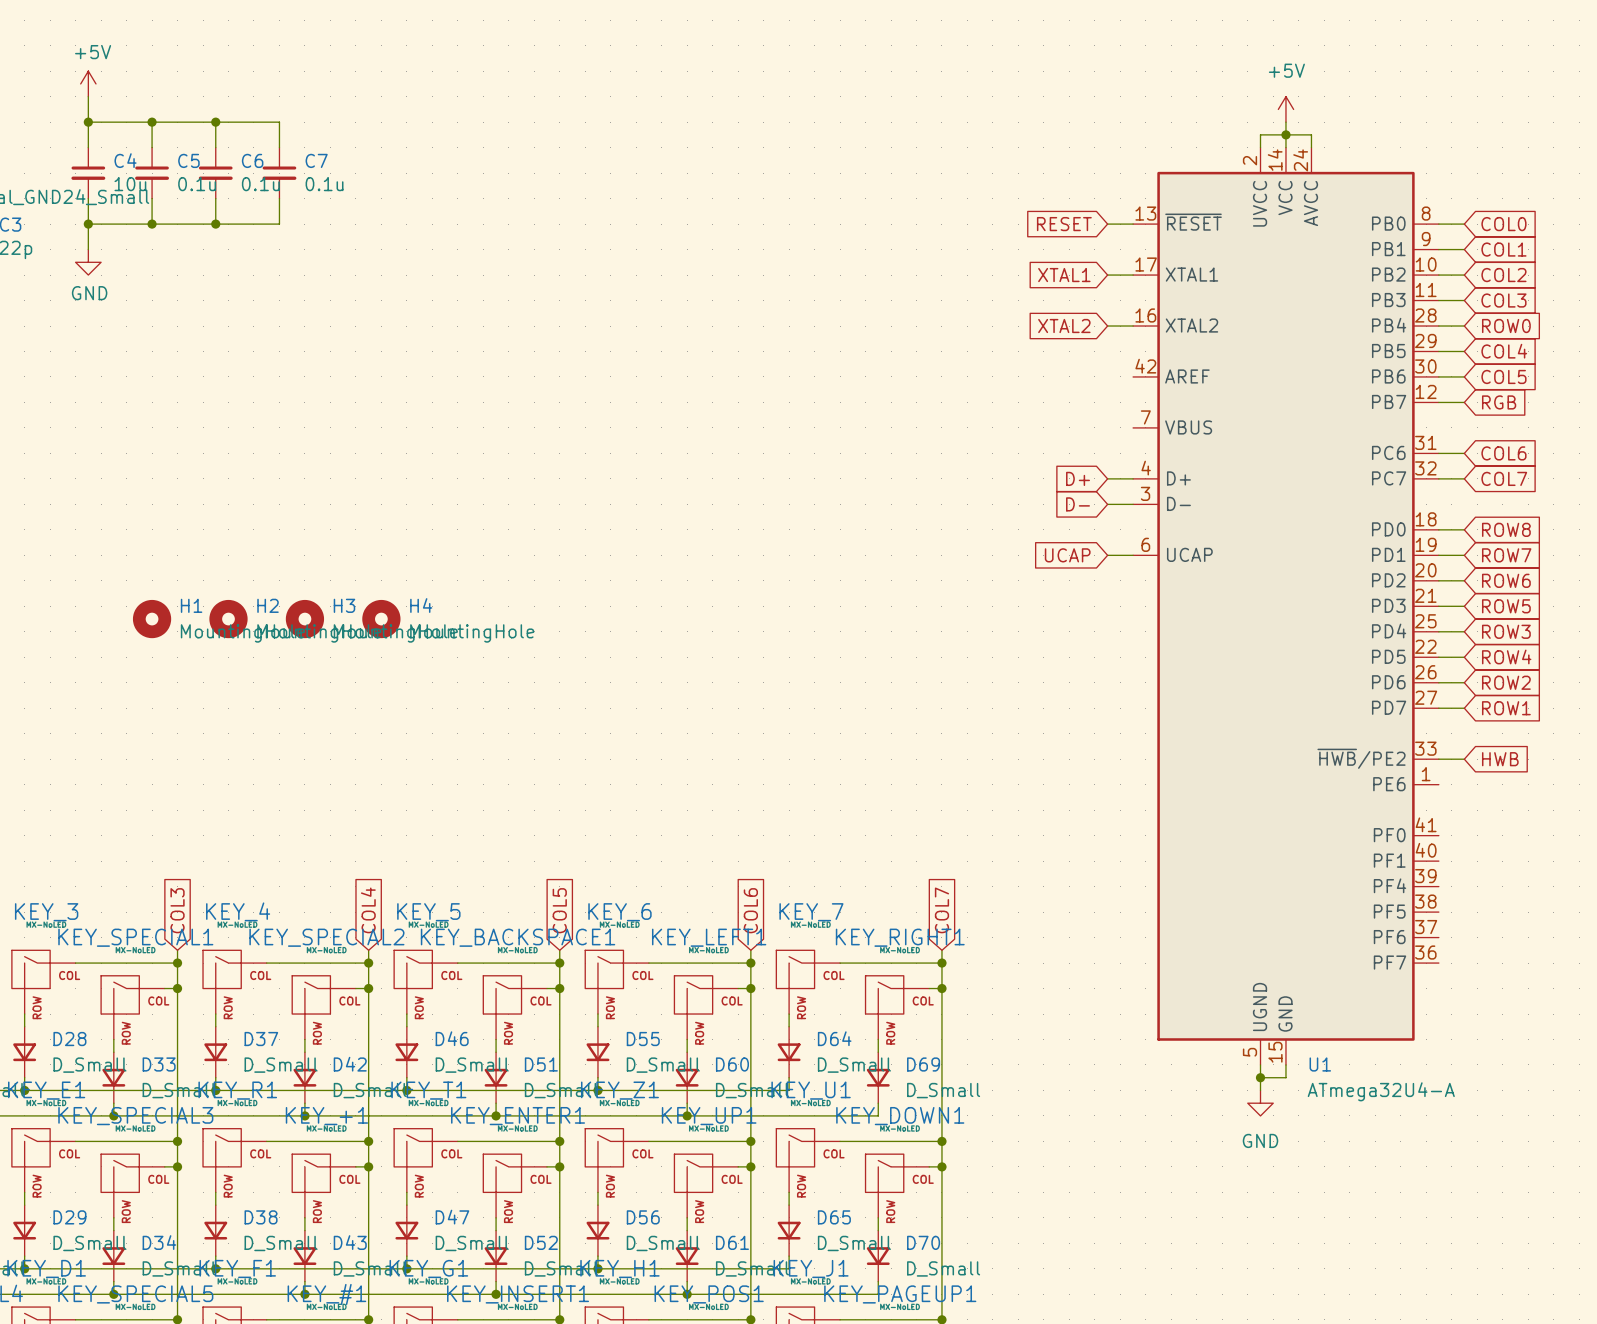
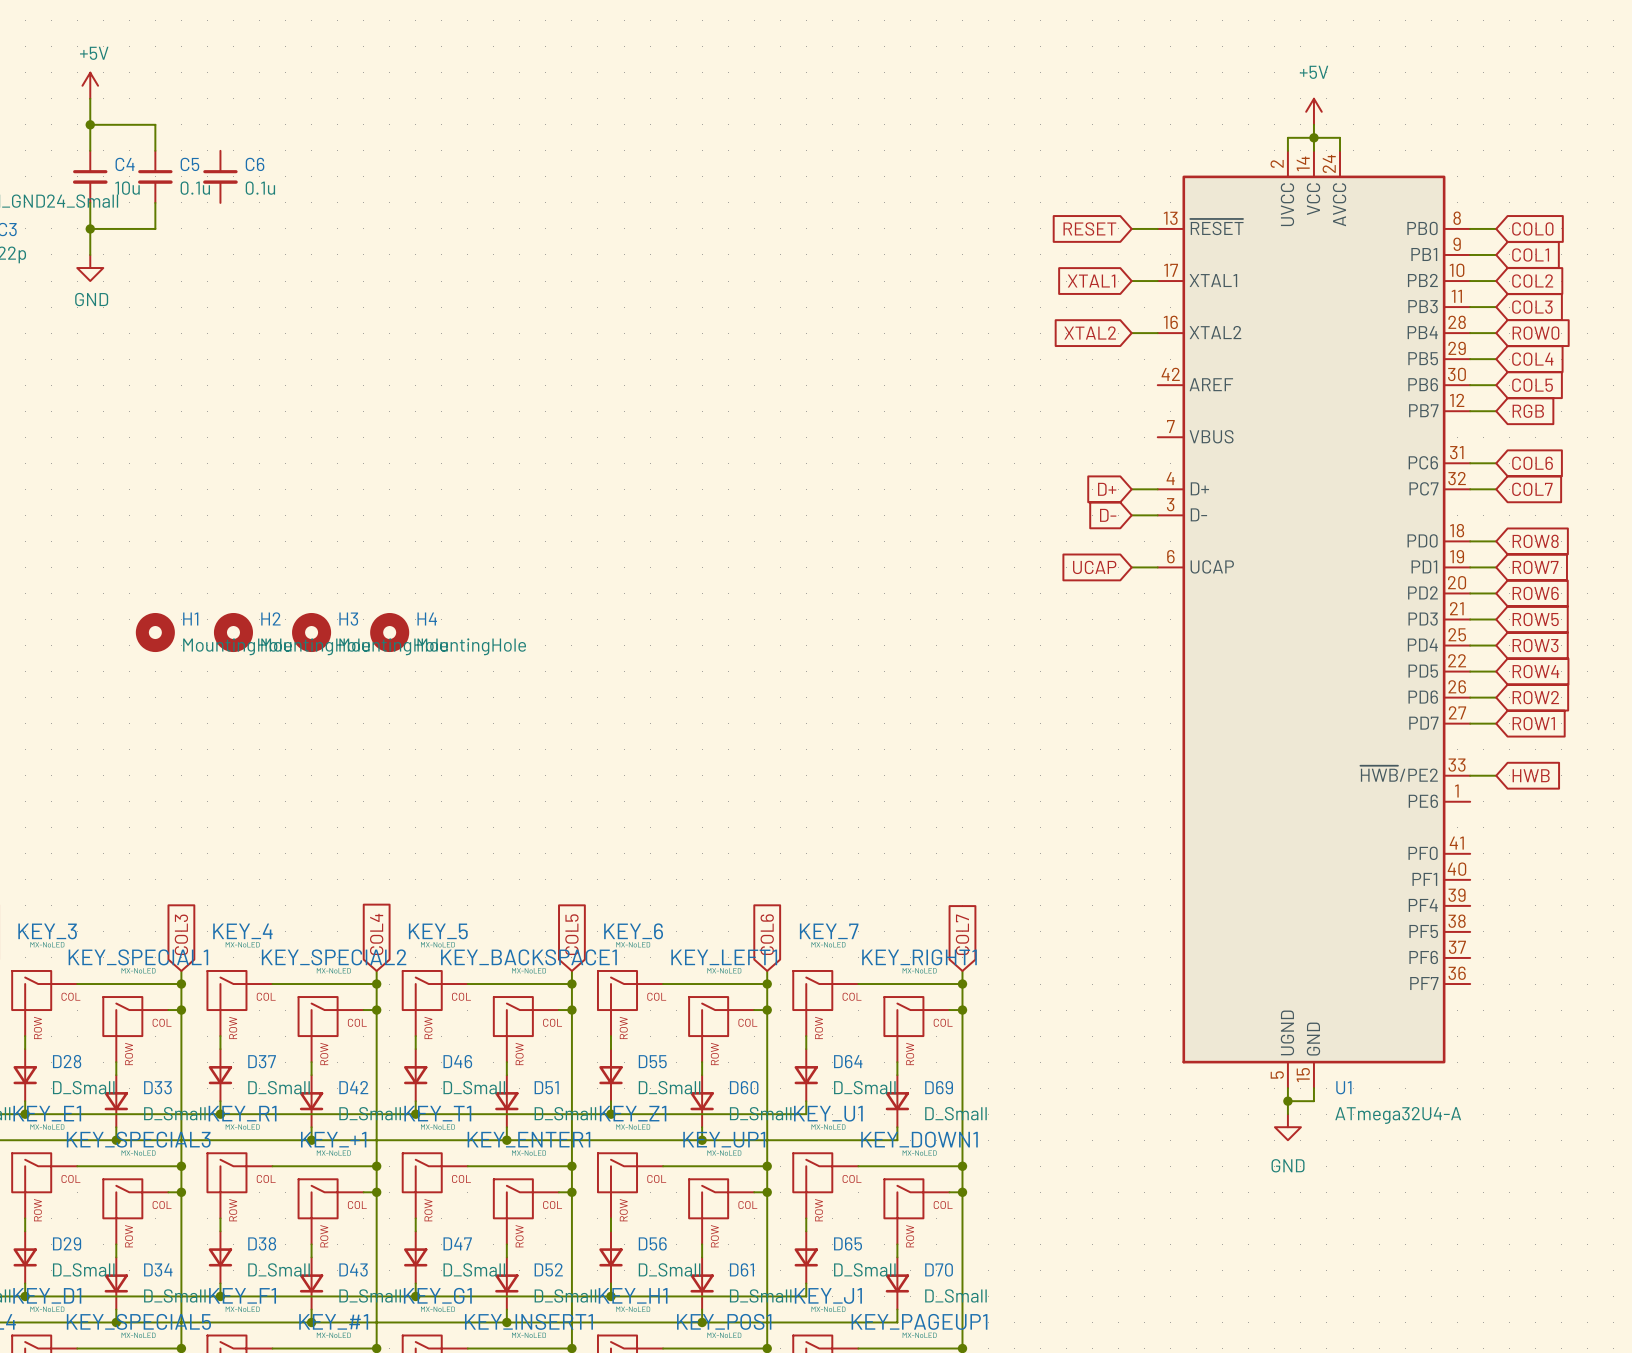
wire: (152, 122) (279, 122) (279, 147) -> none
junction: (152, 122) -> none
wire: (215, 122) (215, 147) -> none
junction: (215, 122) -> none
C7: 0.1u (279, 173) -> none
wire: (215, 198) (215, 224) -> none
wire: (279, 198) (279, 224) (152, 224) -> none
junction: (152, 224) -> none
junction: (215, 224) -> none

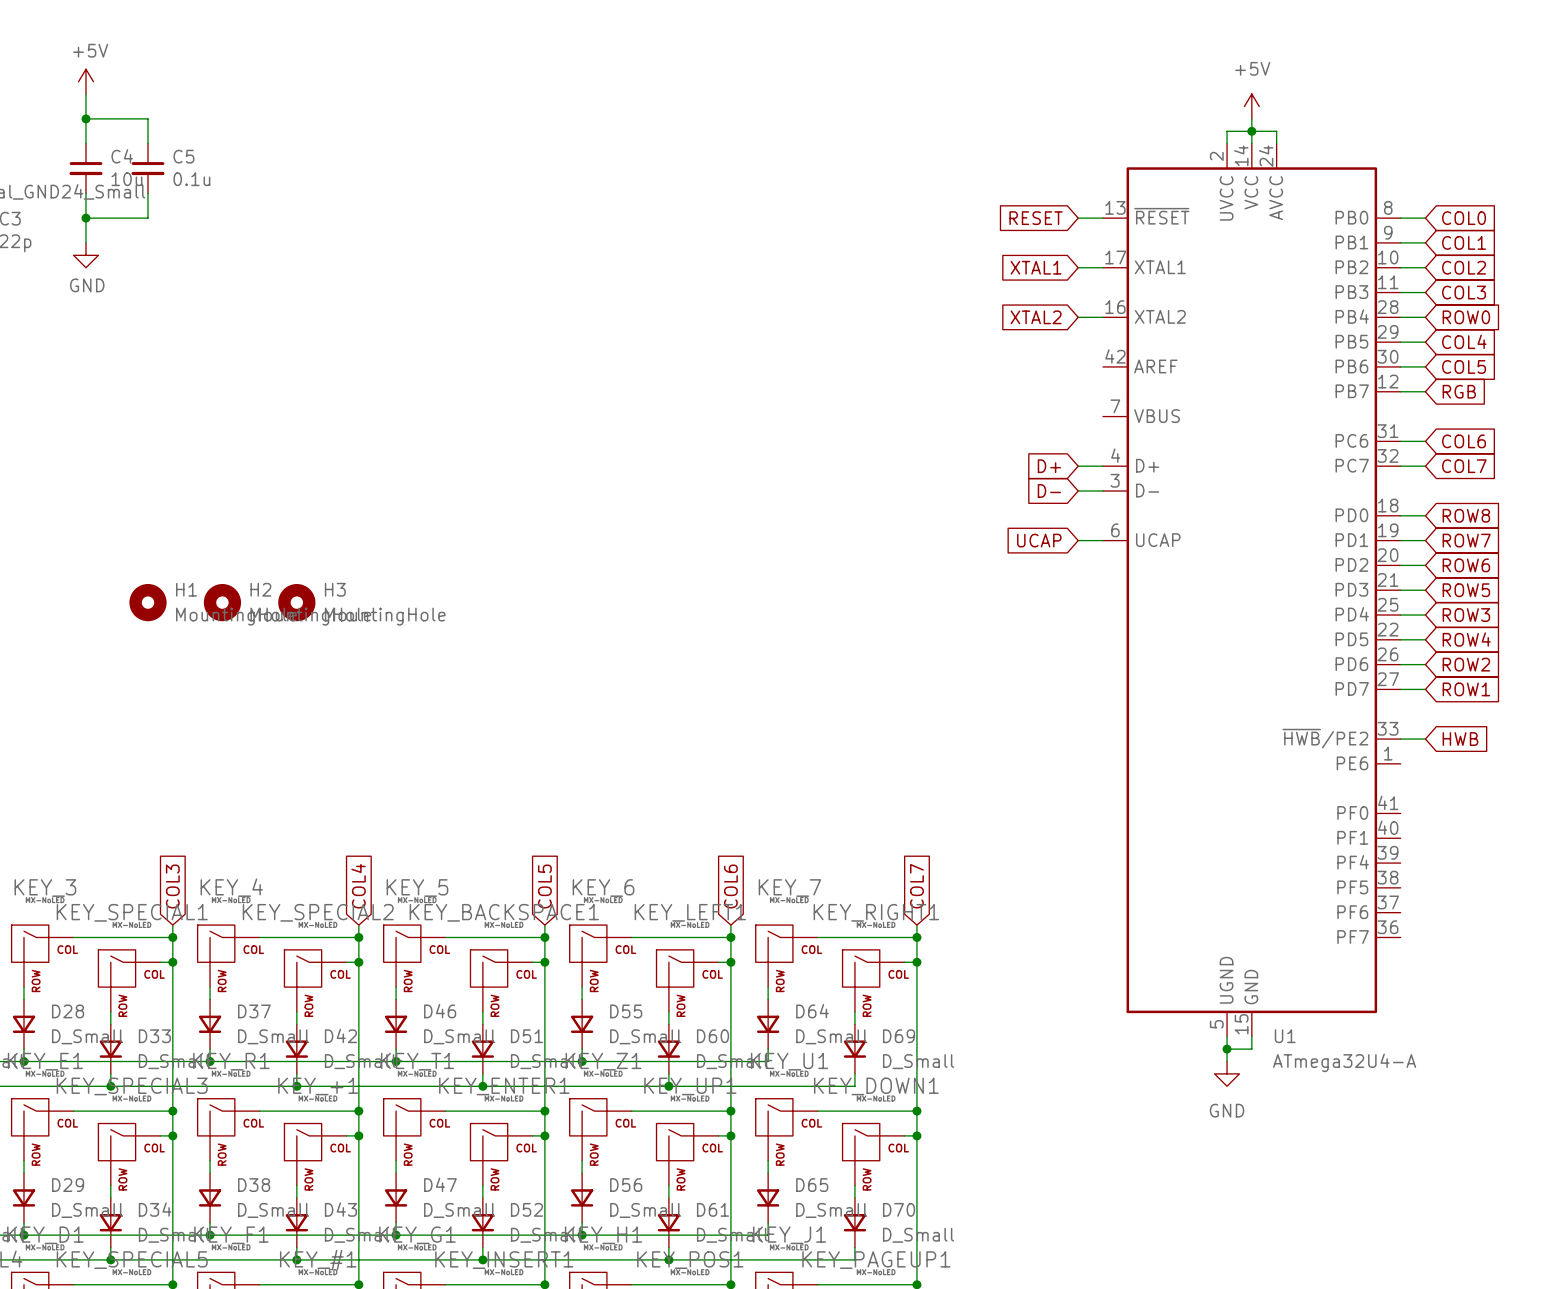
C6: 0.1u (220, 176) -> none
H4: MountingHole (389, 632) -> none

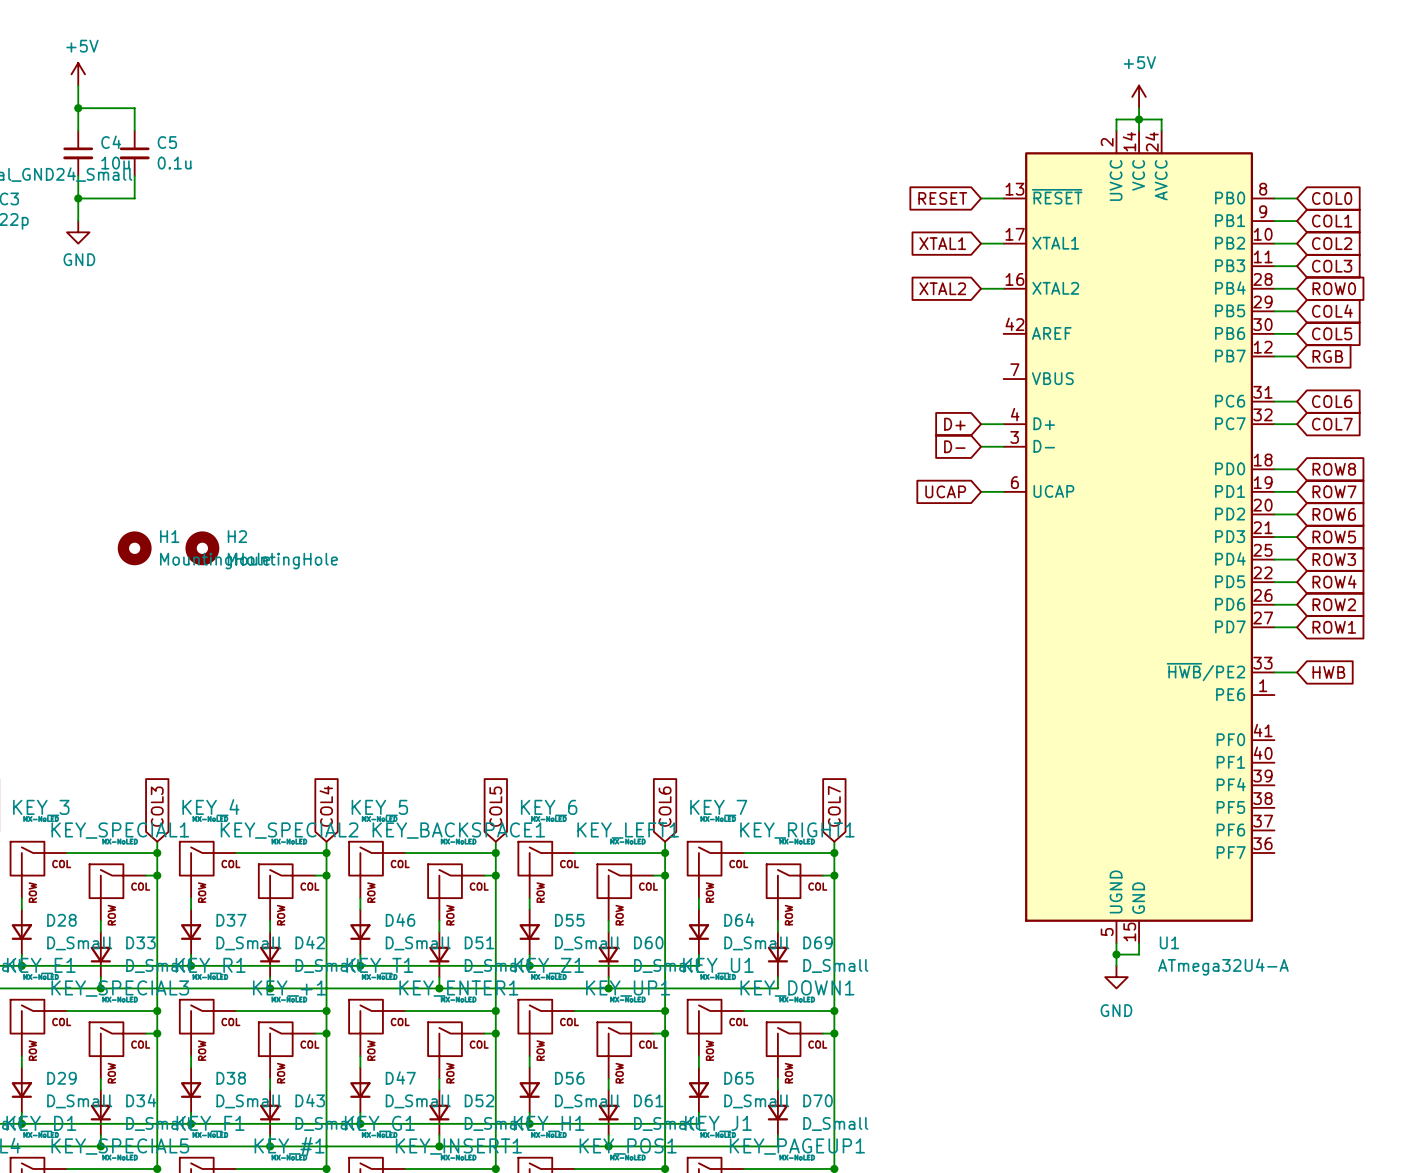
H3: MountingHole (296, 602) -> none

